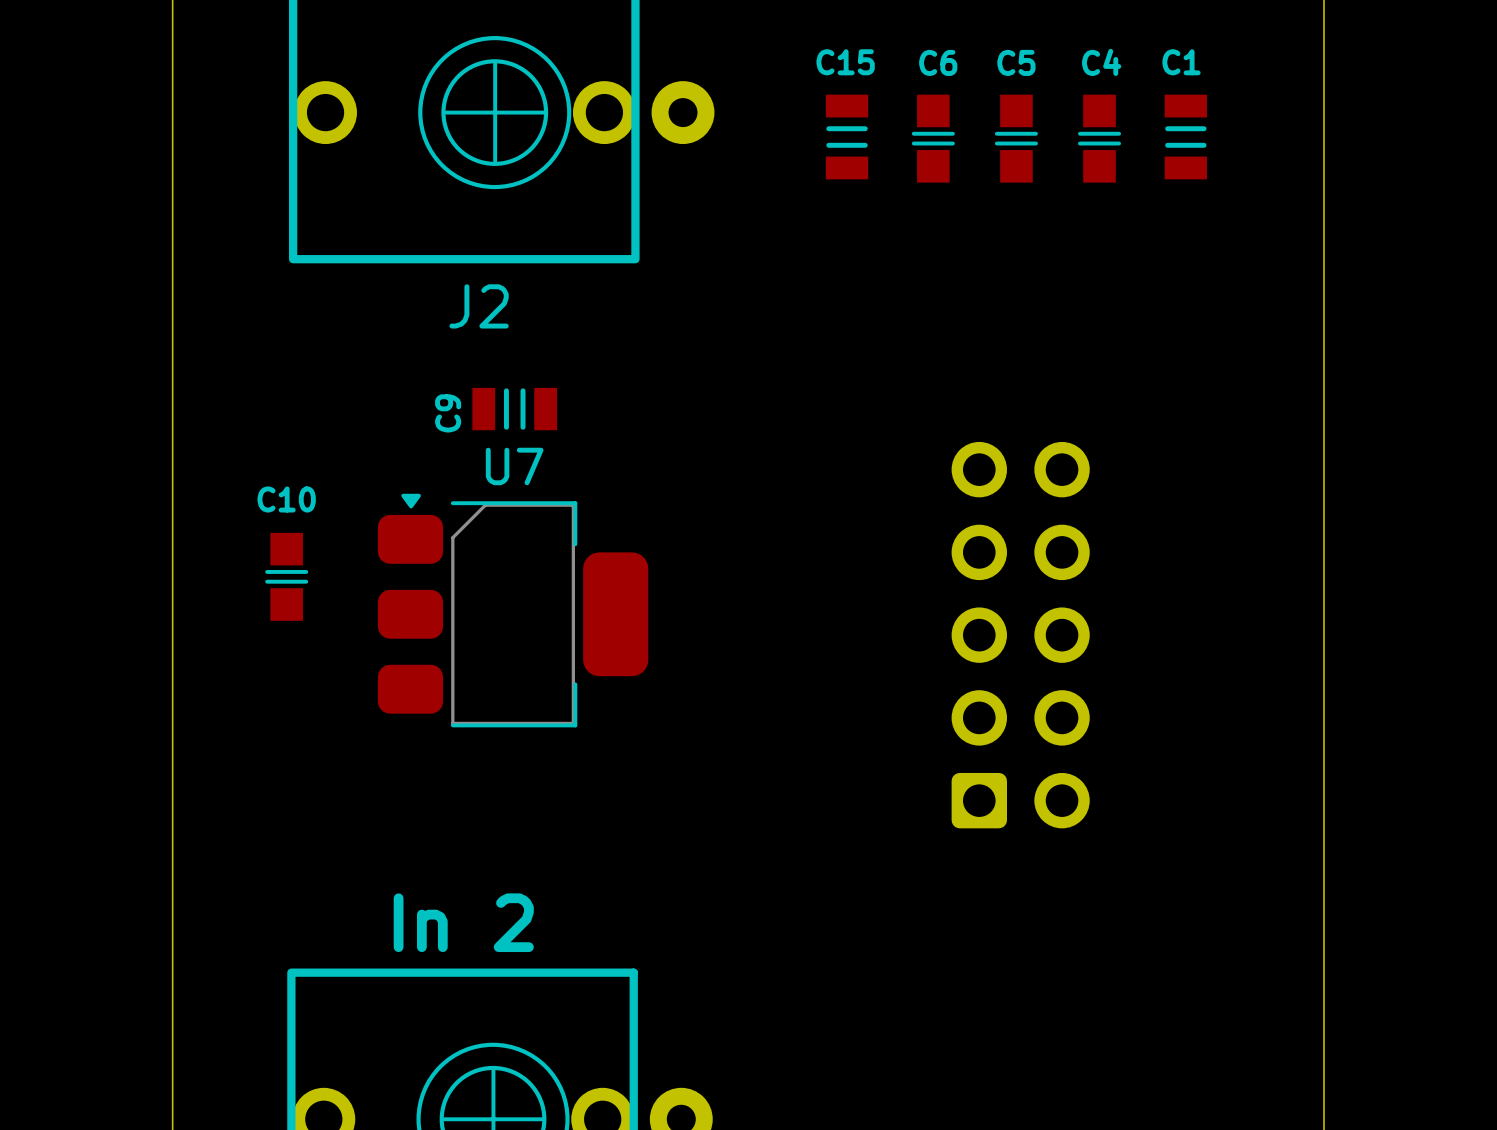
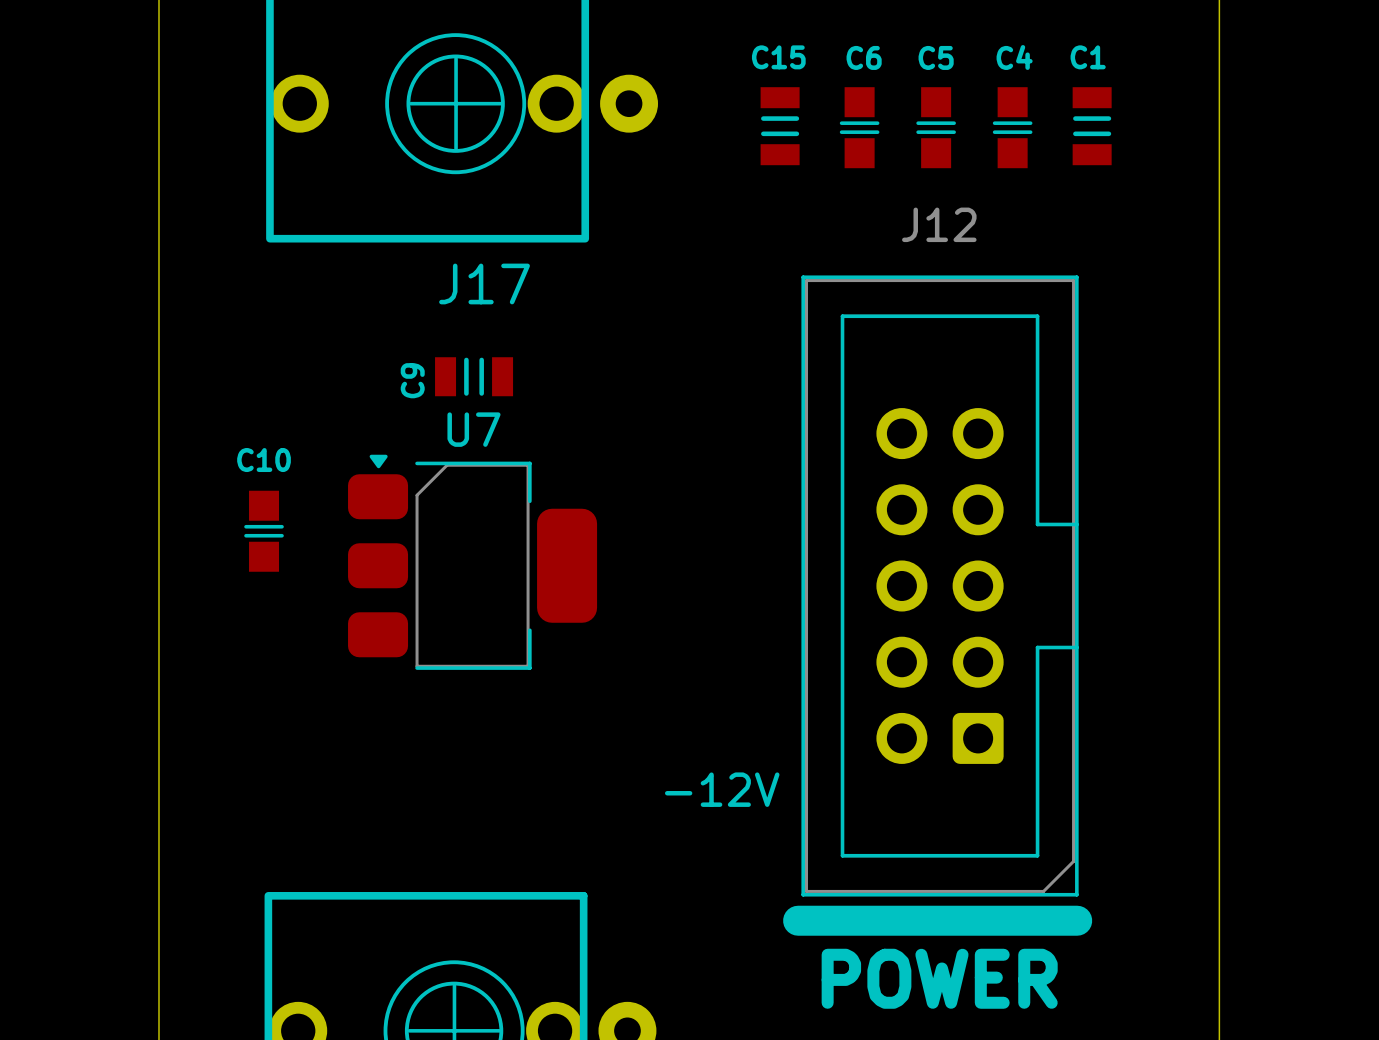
J2 name: J2 (479, 306) -> J17 (484, 283)
J12 side: bottom (1020, 635) -> top (937, 605)
text: In 2 (463, 922) -> none

